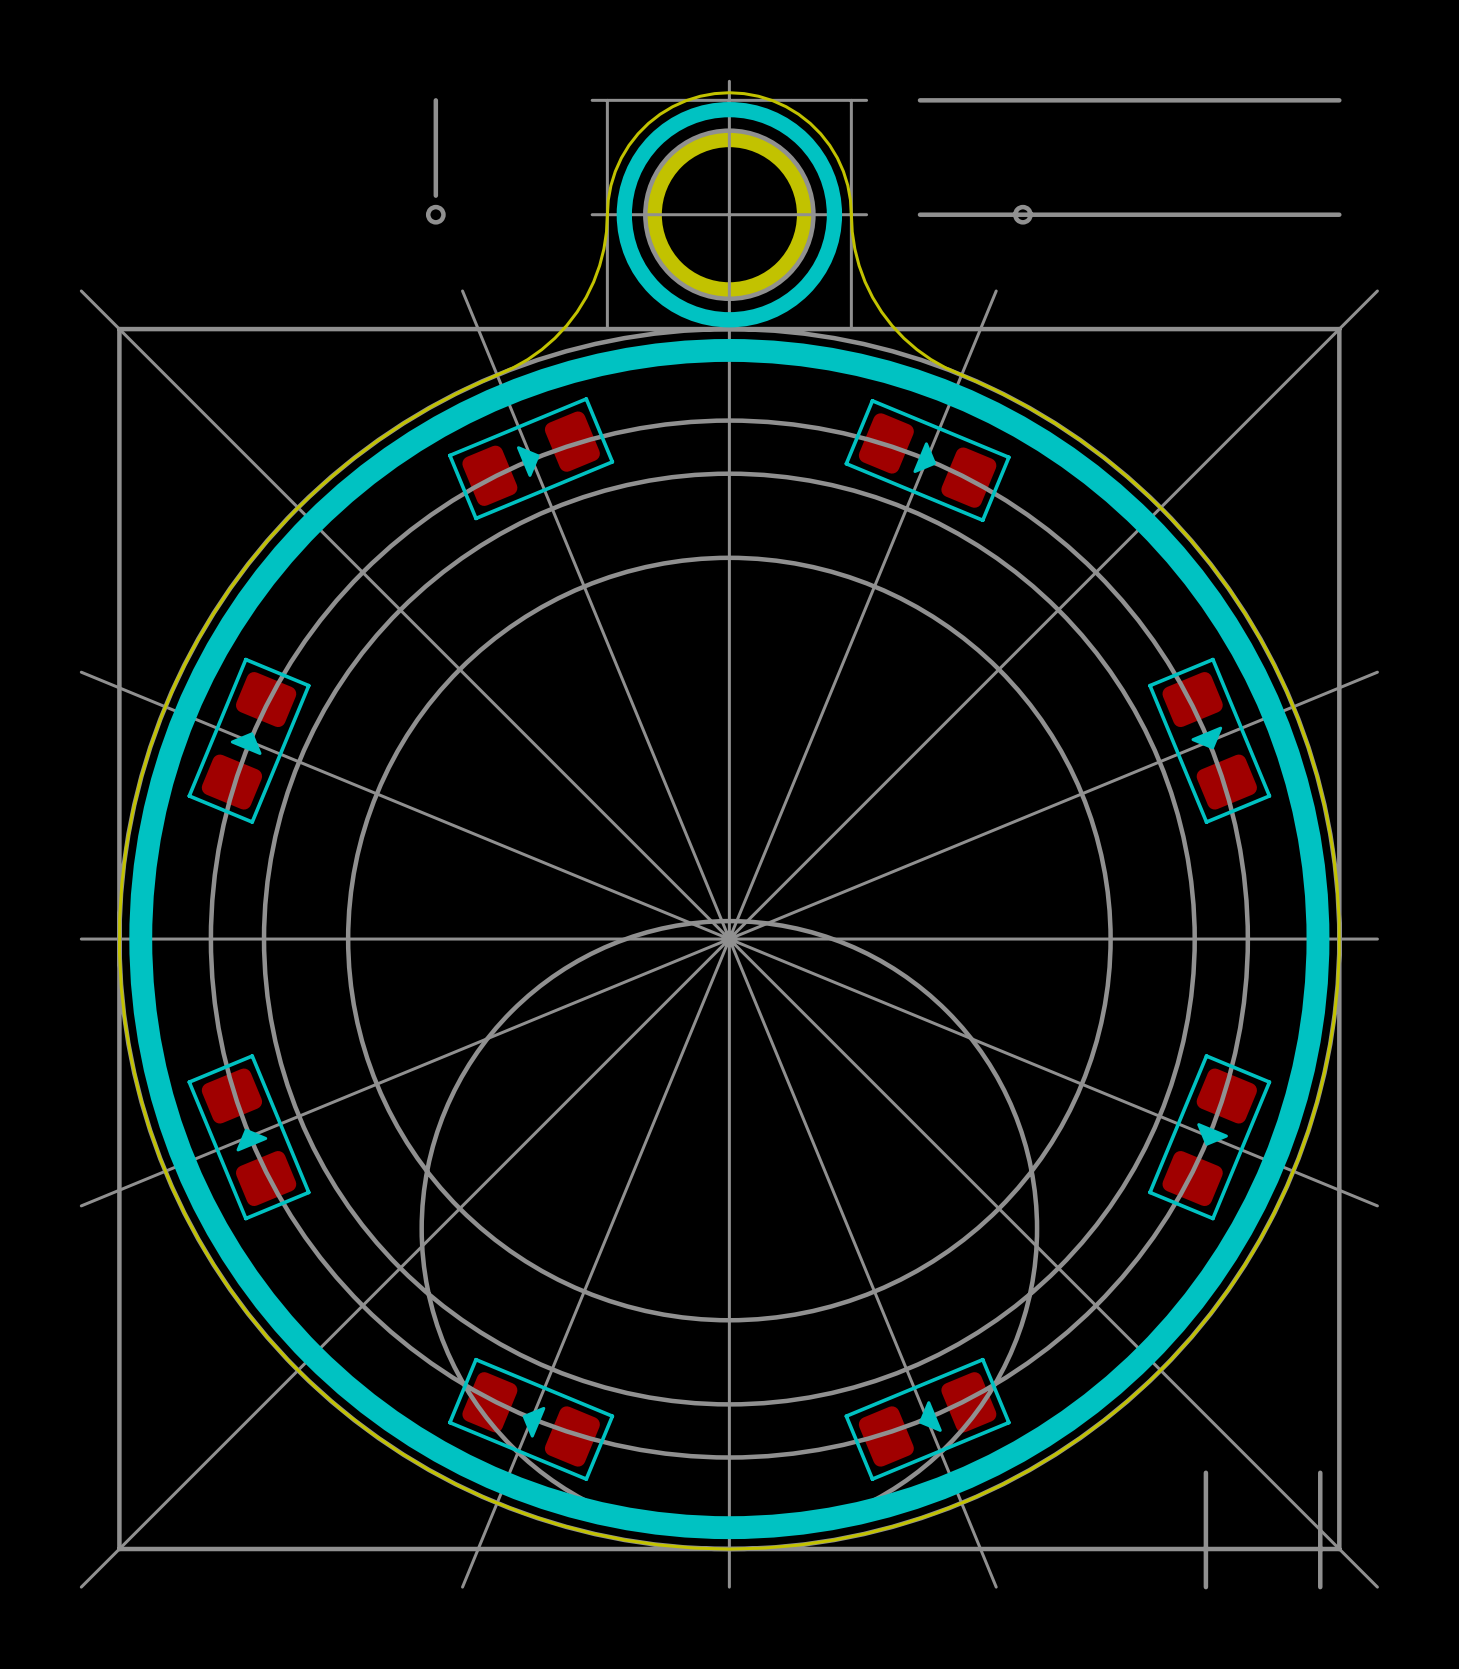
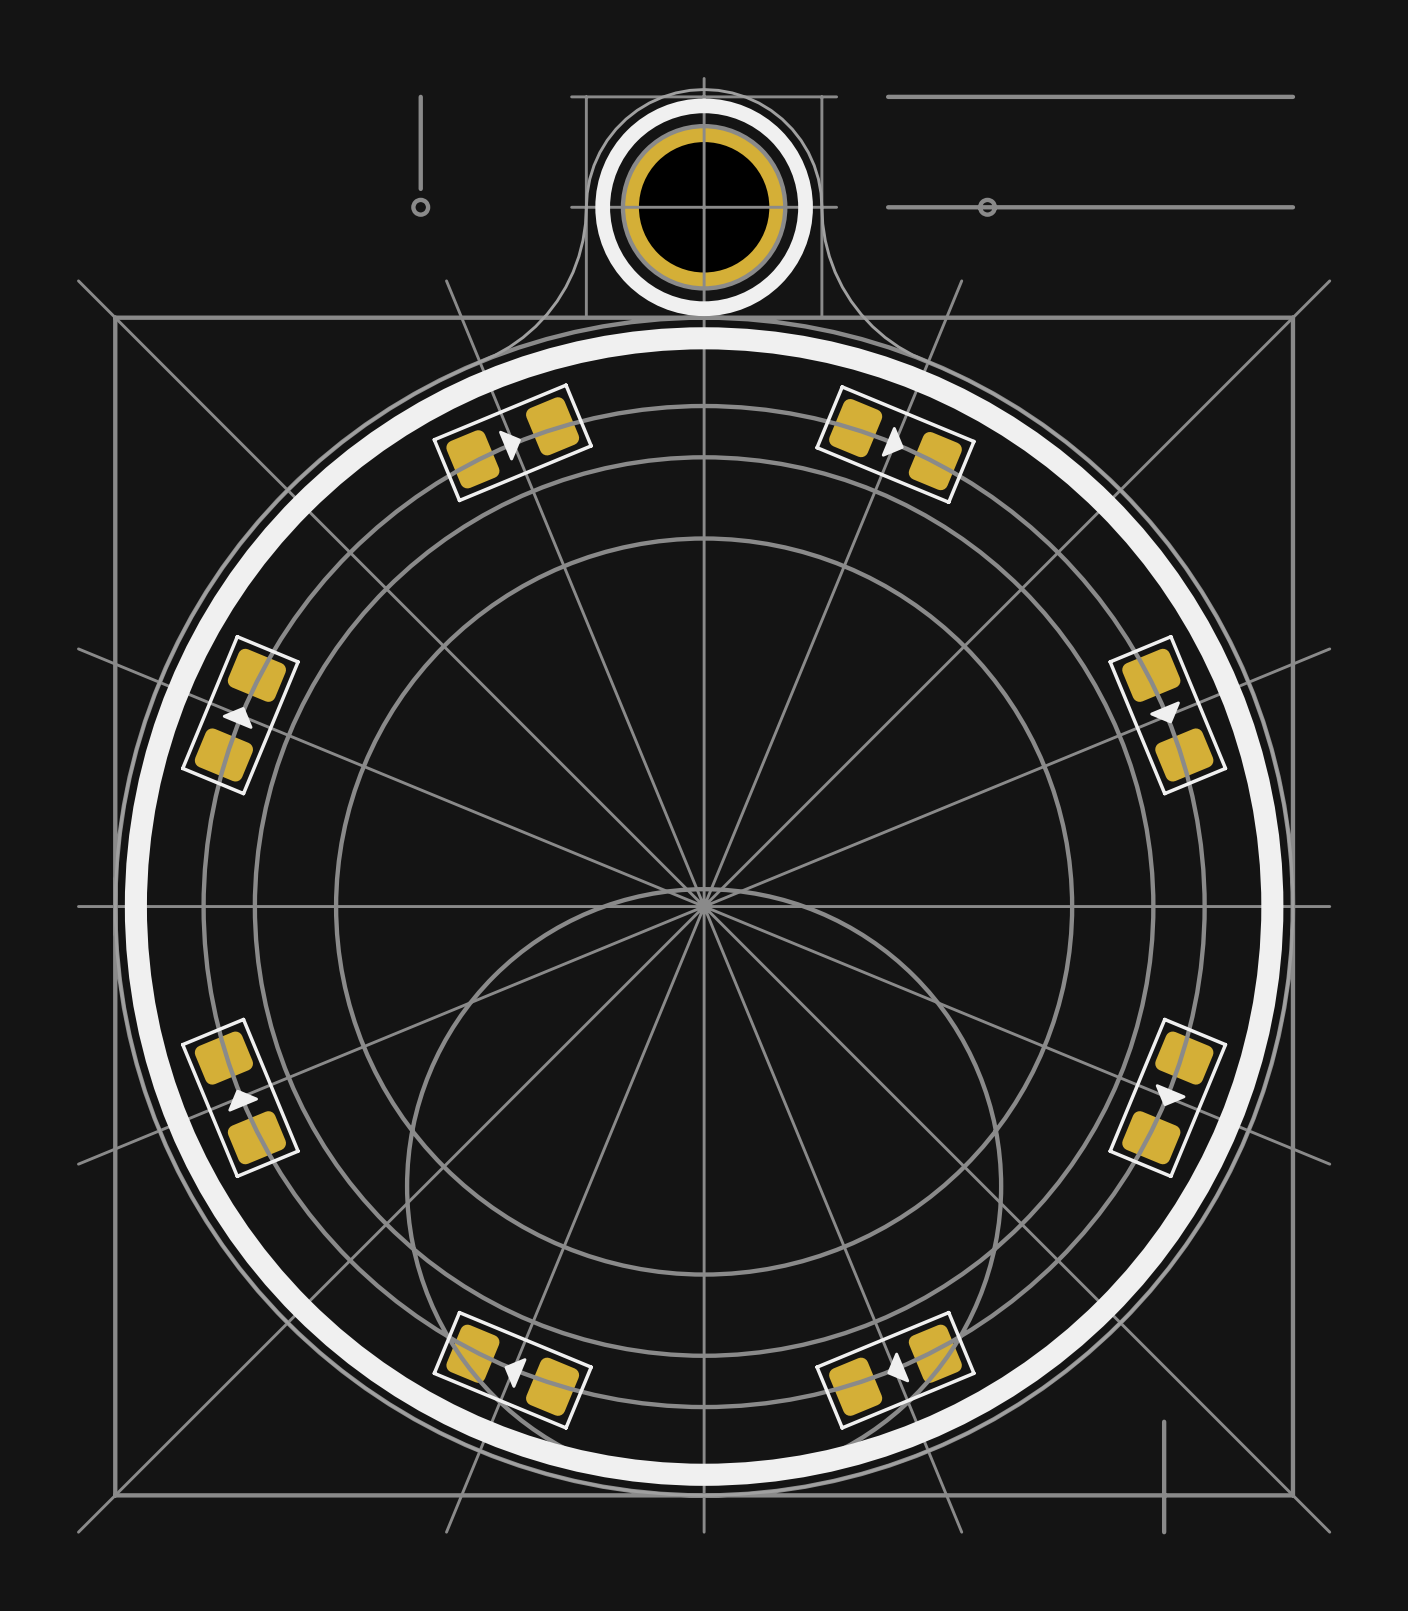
line: (1320, 1472) (1320, 1587) -> none

